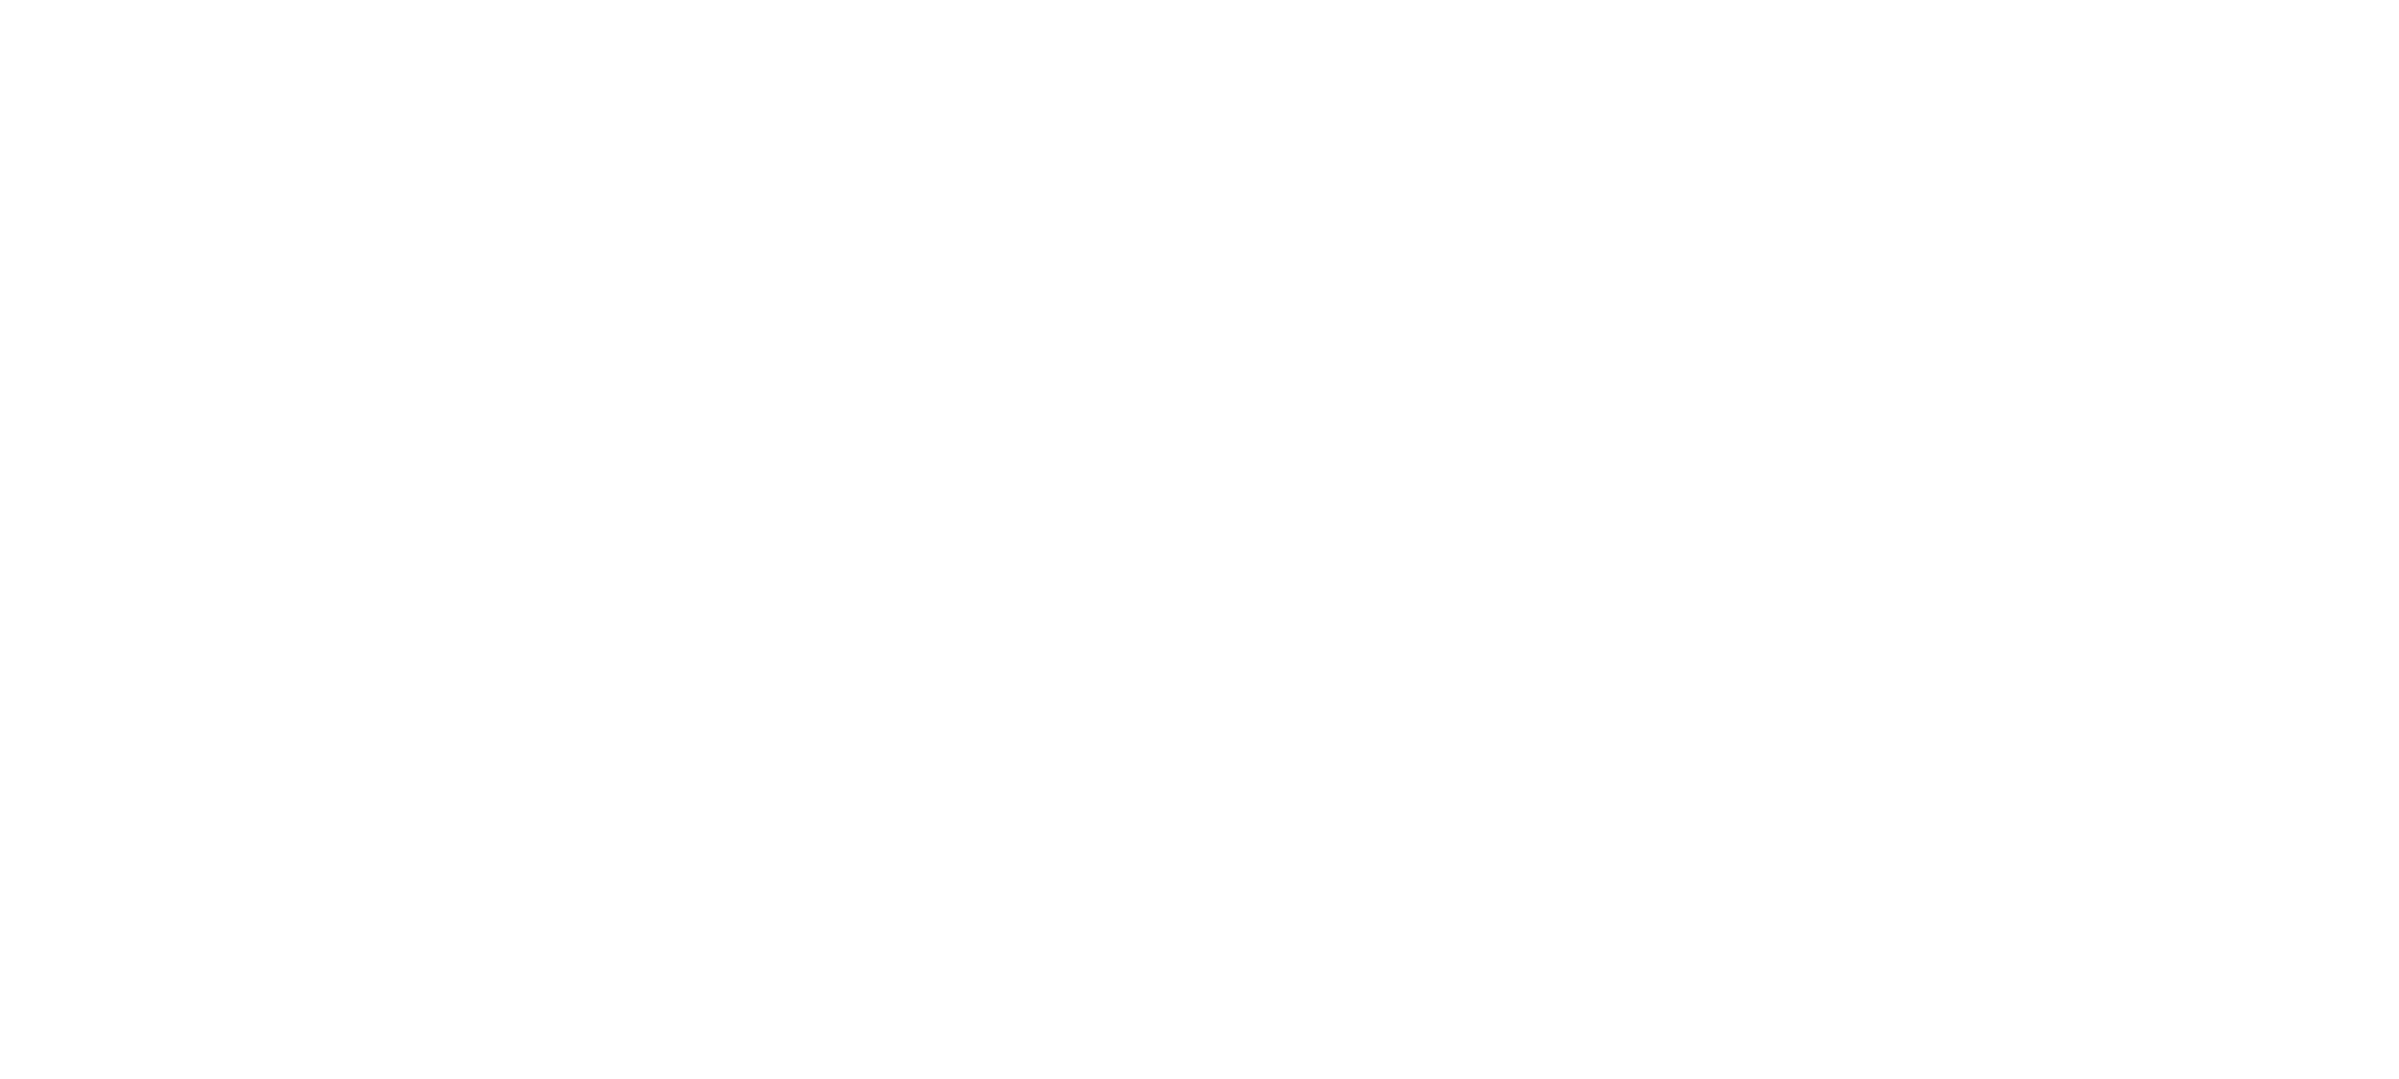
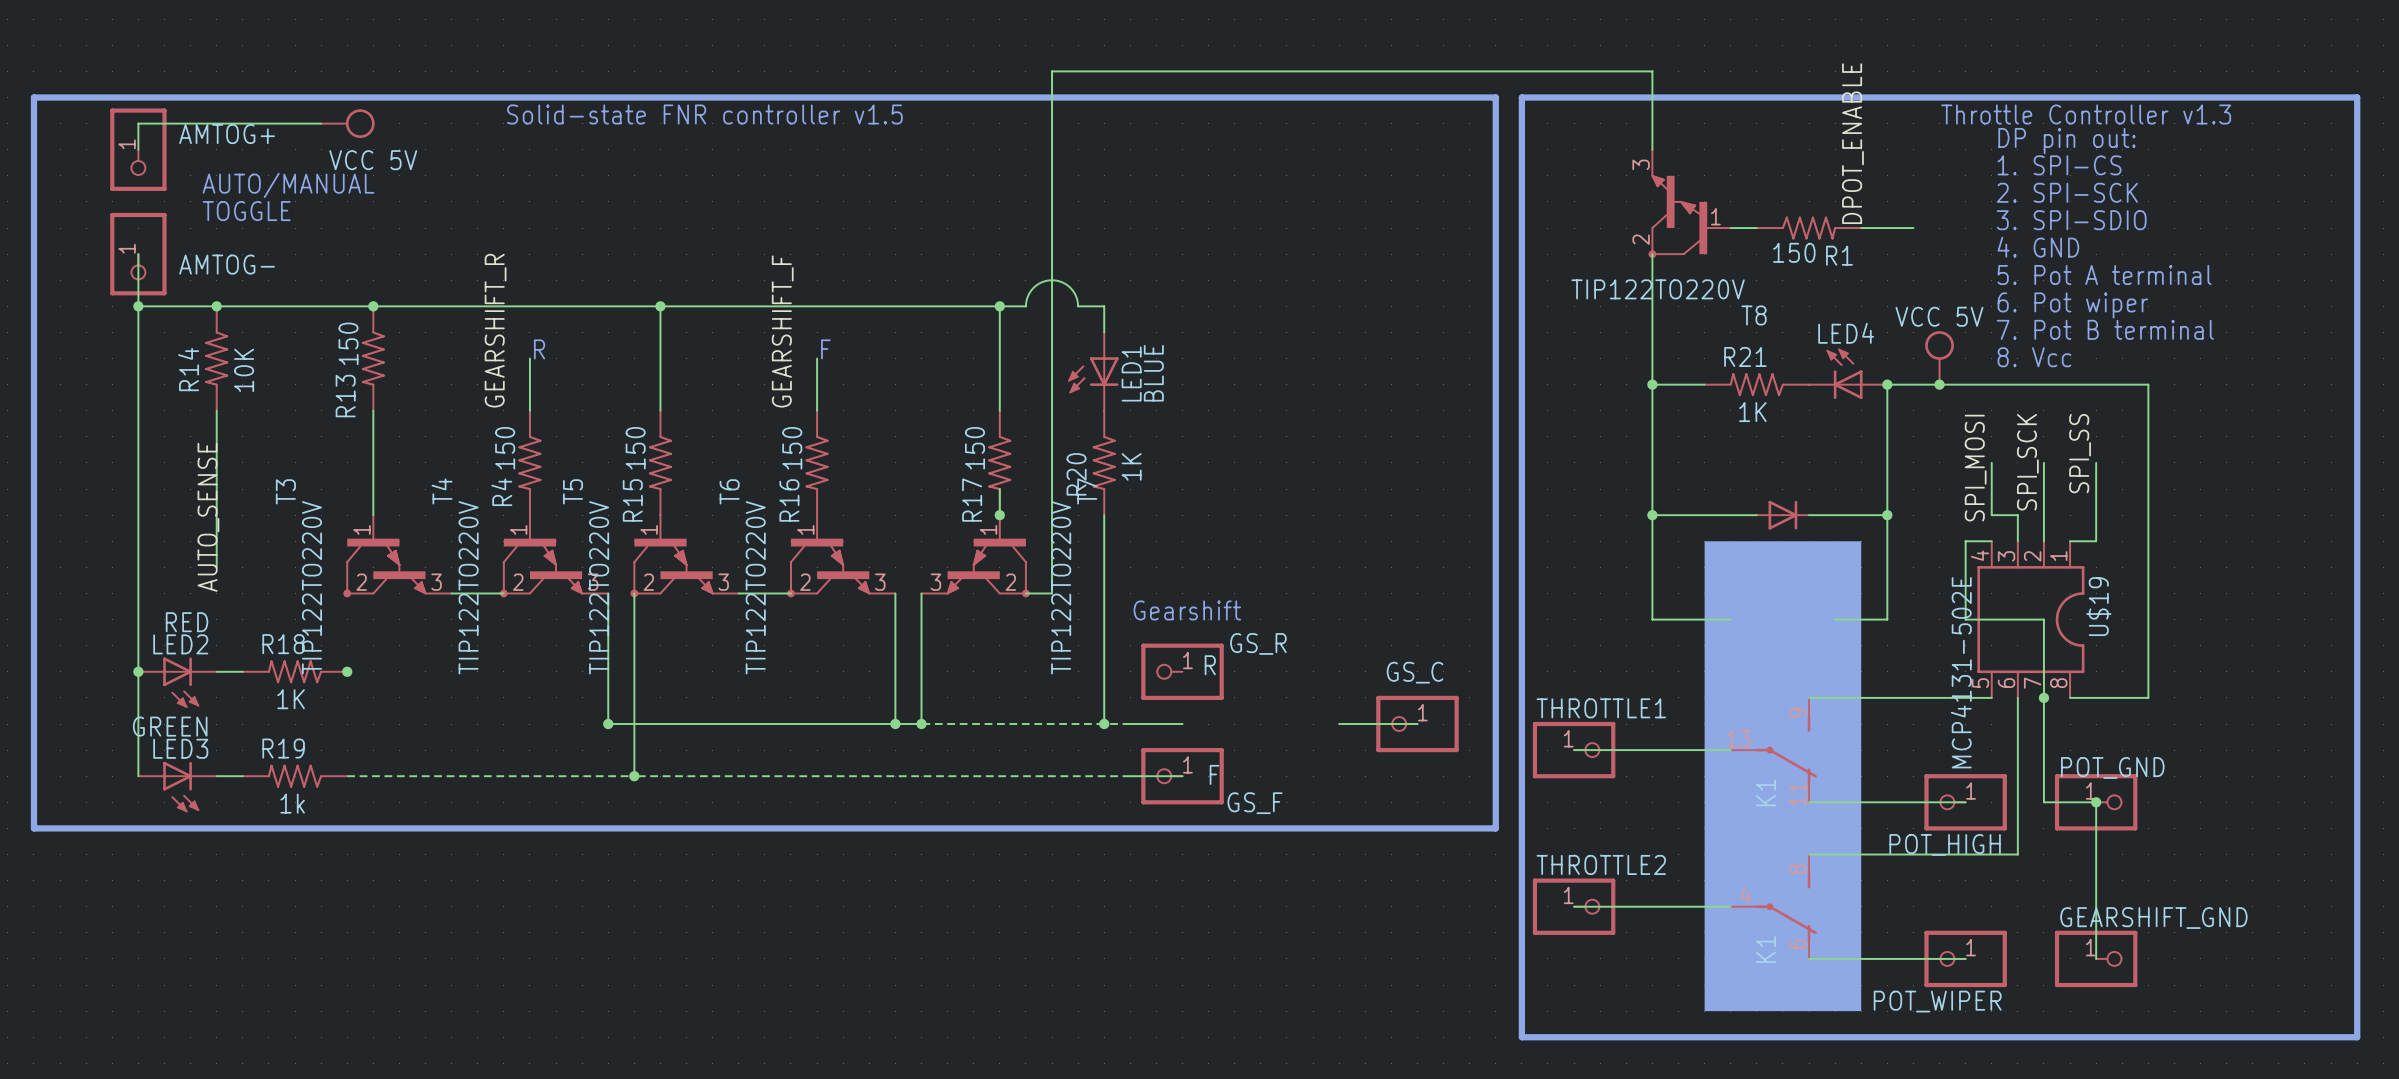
line: none -> (33, 97) (1495, 97) (1495, 828) (33, 828) (33, 97)
line: none -> (1521, 97) (2357, 97) (2357, 1037) (1521, 1037) (1521, 97)
text: none -> Solid-state FNR controller v1.5 (704, 114)
text: none -> Throttle Controller v1.3 (2086, 114)
wire: none -> (321, 123) (138, 123) (138, 149)
power symbol: none -> VCC 5V (347, 123)
text: none -> DP pin out: (2066, 141)
label: none -> DPOT_ENABLE (1852, 143)
AMTOG+: none -> (138, 149)
wire: none -> (1652, 149) (1652, 71) (1052, 71) (1052, 593) (1025, 593)
text: none -> 1. SPI-CS (2059, 165)
text: none -> AUTO/MANUAL (288, 185)
text: none -> 2. SPI-SCK (2067, 192)
T8: none -> TIP122TO220V (1689, 203)
text: none -> TOGGLE (246, 211)
text: none -> 3. SPI-SDIO (2071, 220)
wire: none -> (1730, 228) (1756, 228)
R1: none -> 150 (1809, 228)
wire: none -> (1861, 228) (1913, 228)
text: none -> 4. GND (2038, 247)
wire: none -> (138, 254) (138, 776)
AMTOG-: none -> (138, 254)
wire: none -> (1652, 254) (1652, 619) (1730, 619)
text: none -> 5. Pot A terminal (2104, 275)
text: none -> 6. Pot wiper (2072, 305)
wire: none -> (138, 306) (1025, 306) (1027, 296) (1033, 287) (1042, 282) (1052, 280) (1062, 282) (1070, 287) (1076, 296) (1078, 306) (1104, 306) (1104, 332)
junction: none -> (138, 306)
junction: none -> (216, 306)
junction: none -> (373, 306)
wire: none -> (660, 306) (660, 410)
junction: none -> (660, 306)
wire: none -> (999, 306) (999, 410)
junction: none -> (999, 306)
text: none -> 7. Pot B terminal (2105, 329)
label: none -> GEARSHIFT_R (495, 330)
label: none -> GEARSHIFT_F (782, 331)
text: none -> R (539, 349)
text: none -> F (825, 349)
power symbol: none -> VCC 5V (1939, 357)
text: none -> 8. Vcc (2034, 357)
R14: none -> 10K (216, 358)
R13: none -> 150 (373, 358)
wire: none -> (529, 358) (529, 410)
wire: none -> (817, 358) (817, 410)
LED1: none -> BLUE (1093, 371)
LED4: none -> (1848, 373)
wire: none -> (1652, 384) (1704, 384)
junction: none -> (1652, 384)
R21: none -> 1K (1756, 384)
junction: none -> (1887, 384)
junction: none -> (1939, 384)
wire: none -> (216, 410) (216, 567)
wire: none -> (373, 410) (373, 515)
label: none -> SPI_SS (2080, 453)
R4: none -> 150 (529, 462)
R15: none -> 150 (660, 462)
R16: none -> 150 (817, 462)
R17: none -> 150 (999, 462)
R20: none -> 1K (1104, 462)
wire: none -> (1991, 462) (1991, 515) (2017, 515) (2017, 541)
label: none -> SPI_SCK (2027, 462)
wire: none -> (2043, 462) (2043, 541)
wire: none -> (2096, 462) (2096, 541) (2070, 541)
label: none -> SPI_MOSI (1975, 468)
wire: none -> (999, 489) (999, 515)
junction: none -> (999, 515)
wire: none -> (1104, 515) (1104, 724)
wire: none -> (1652, 515) (1756, 515)
junction: none -> (1652, 515)
part: none -> (1782, 515)
wire: none -> (1809, 515) (1887, 515)
junction: none -> (1887, 515)
label: none -> AUTO_SENSE (208, 517)
drawing: none -> [1704, 541, 1862, 1012]
wire: none -> (1991, 541) (1965, 541) (1965, 619) (2043, 619) (2043, 802) (2096, 802) (2096, 958)
T3: none -> TIP122TO220V (397, 556)
T4: none -> TIP122TO220V (554, 556)
T5: none -> TIP122TO220V (684, 556)
T6: none -> TIP122TO220V (841, 556)
T7: none -> TIP122TO220V (975, 556)
wire: none -> (451, 593) (503, 593)
wire: none -> (608, 593) (608, 724) (921, 724)
wire: none -> (634, 593) (634, 776)
wire: none -> (738, 593) (790, 593)
wire: none -> (895, 593) (895, 724)
wire: none -> (921, 593) (921, 724)
text: none -> Gearshift (1187, 610)
wire: none -> (1835, 619) (1887, 619) (1887, 384) (2148, 384) (2148, 697) (2070, 697)
U$19: none -> MCP4131-502E (2030, 619)
junction: none -> (138, 671)
wire: none -> (216, 671) (242, 671)
R18: none -> 1K (295, 671)
junction: none -> (347, 671)
GS_R: none -> R (1182, 671)
LED2: none -> RED (177, 682)
wire: none -> (1809, 697) (1991, 697)
wire: none -> (2017, 697) (2017, 854) (1809, 854)
junction: none -> (2043, 697)
junction: none -> (608, 724)
junction: none -> (895, 724)
wire: none -> (921, 724) (1182, 724)
junction: none -> (921, 724)
junction: none -> (1104, 724)
wire: none -> (1339, 724) (1417, 724)
GS_C: none -> (1417, 724)
wire: none -> (1574, 750) (1730, 750)
THROTTLE1: none -> (1574, 750)
part: none -> (1773, 750)
wire: none -> (216, 776) (242, 776)
R19: none -> 1k (295, 776)
wire: none -> (347, 776) (1182, 776)
junction: none -> (634, 776)
GS_F: none -> F (1182, 776)
LED3: none -> GREEN (177, 787)
wire: none -> (1809, 802) (1965, 802)
POT_HIGH: none -> (1965, 802)
part: none -> POT_GND (2096, 802)
junction: none -> (2096, 802)
wire: none -> (1574, 906) (1730, 906)
THROTTLE2: none -> (1574, 906)
part: none -> (1773, 906)
wire: none -> (1809, 958) (1965, 958)
POT_WIPER: none -> (1965, 958)
GEARSHIFT_GND: none -> (2096, 958)

